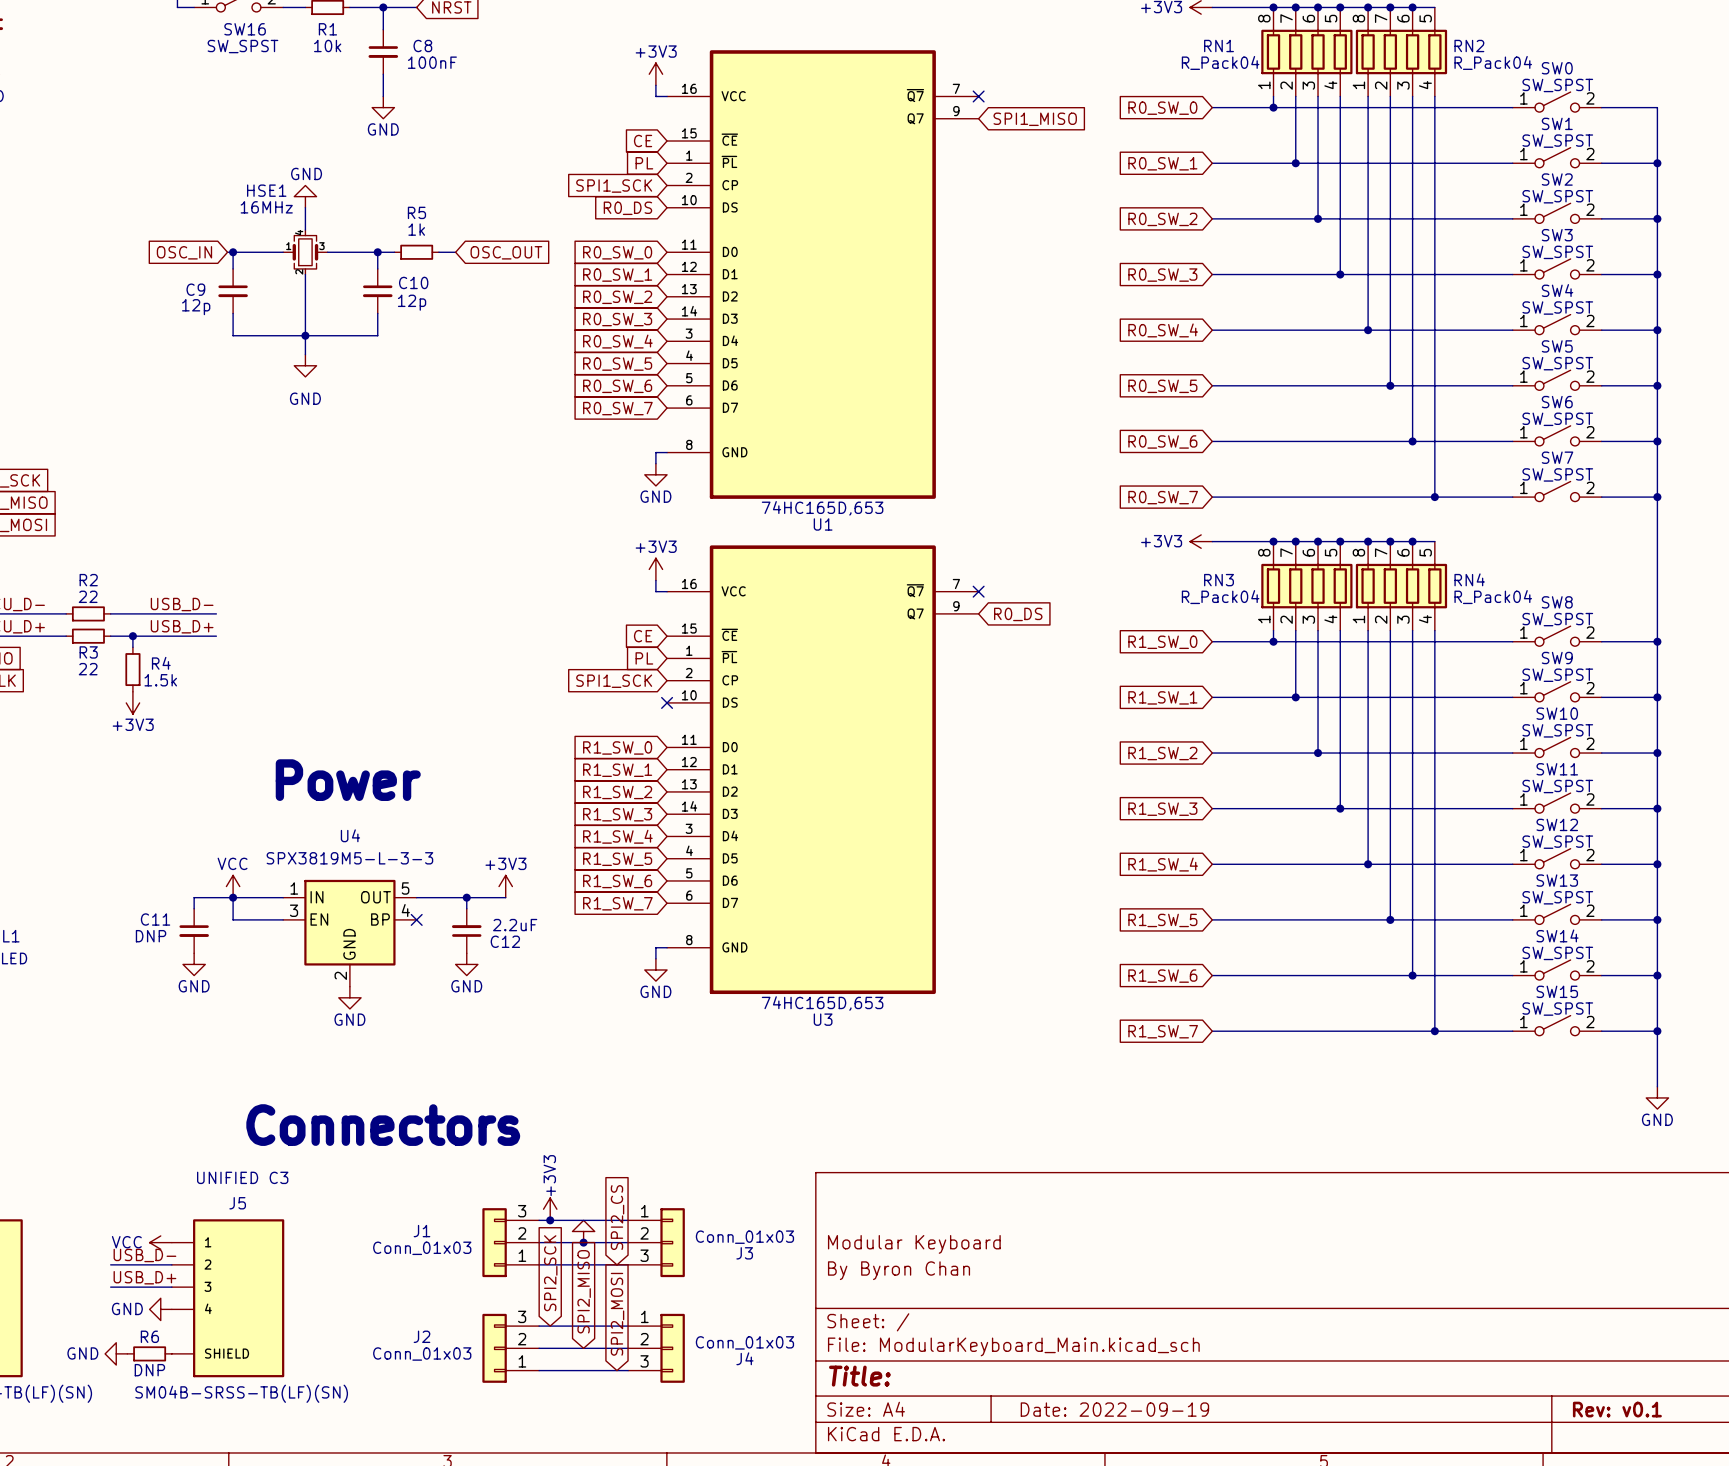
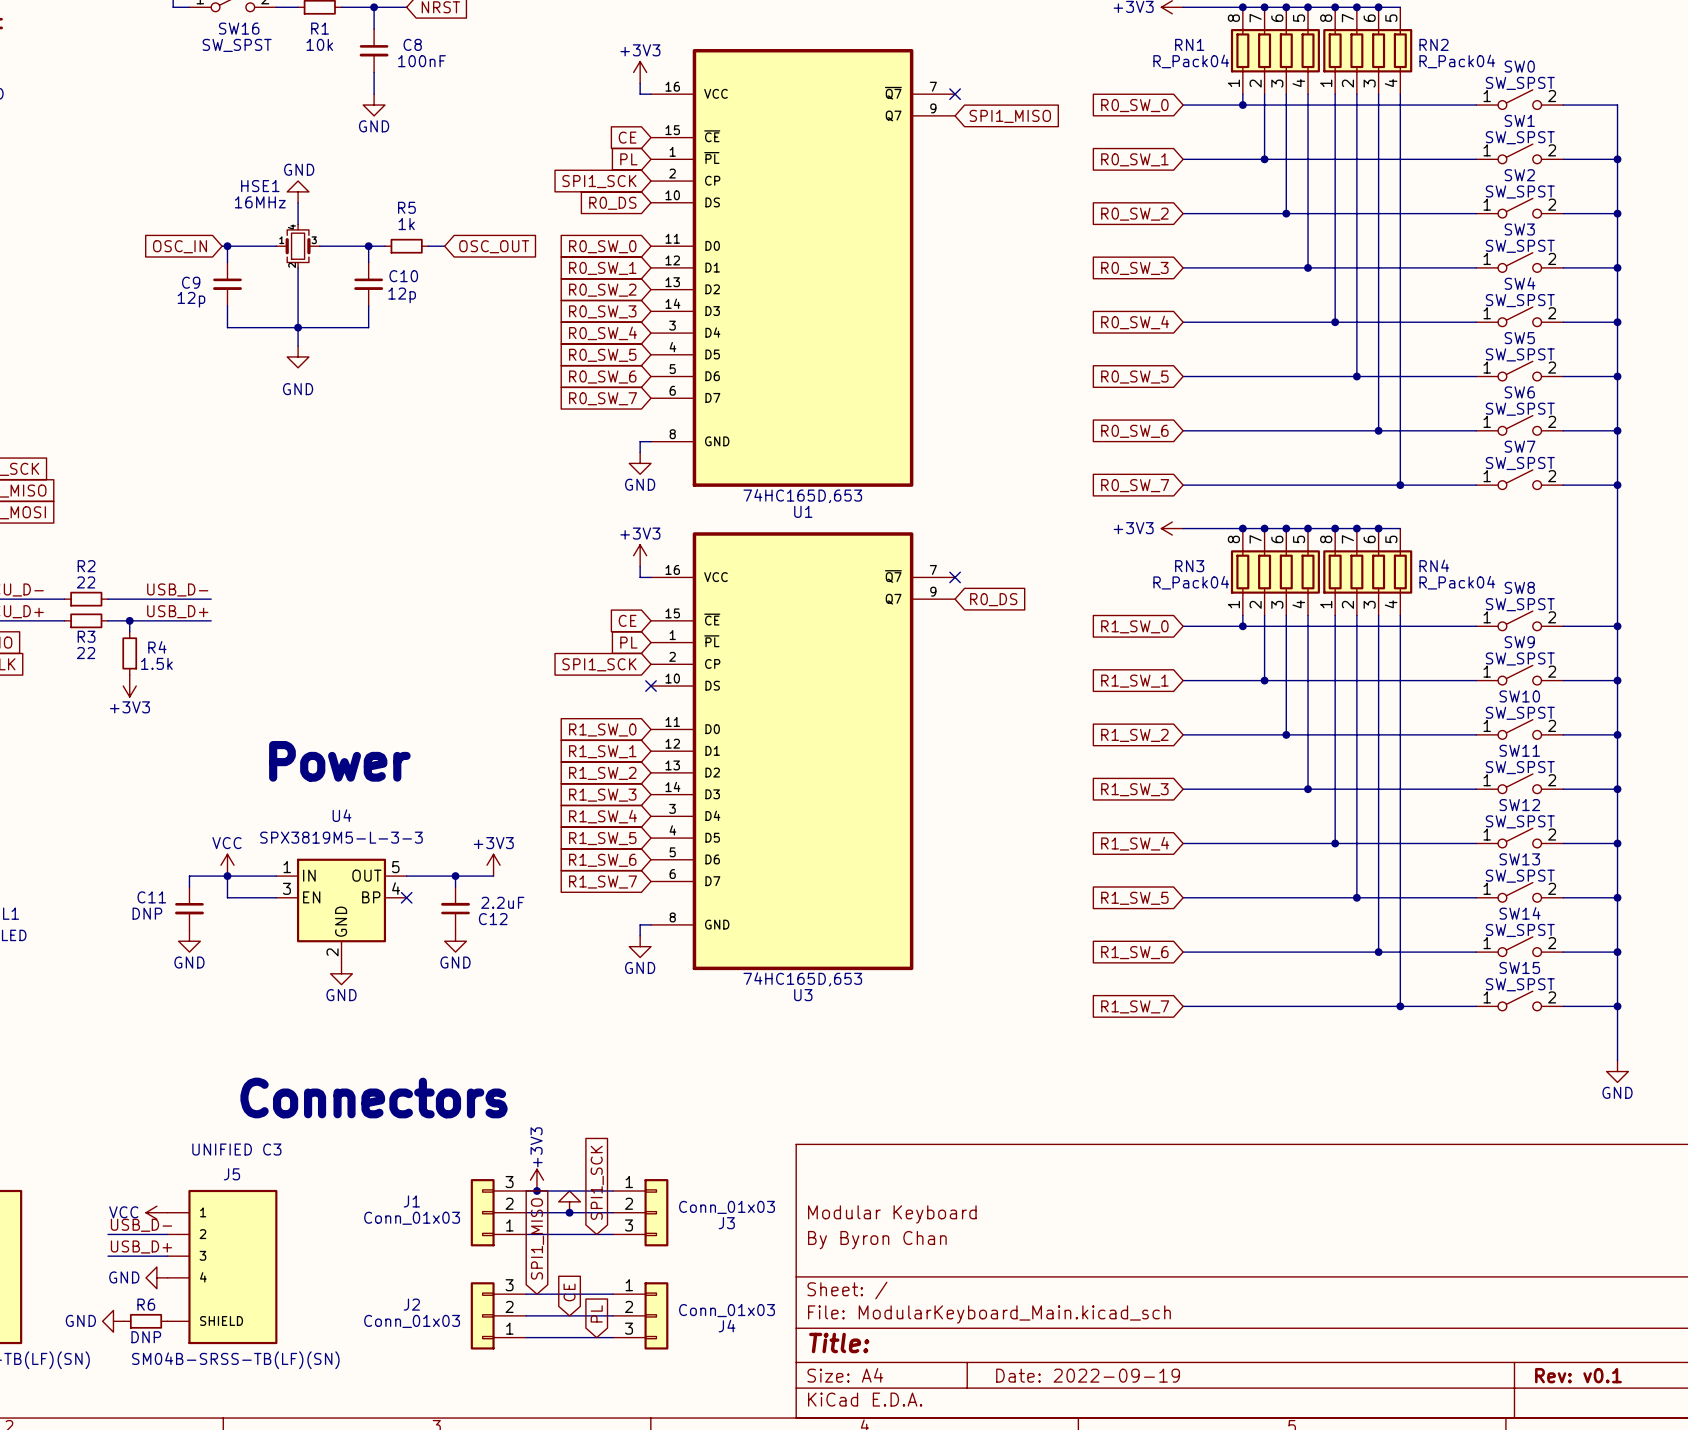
global label: SPI2_CS (617, 1217) -> SPI1_SCK (597, 1182)
global label: SPI2_SCK (550, 1273) -> SPI1_MISO (537, 1238)
global label: SPI2_MISO (584, 1291) -> CE (569, 1292)
global label: SPI2_MOSI (617, 1314) -> PL (596, 1313)

